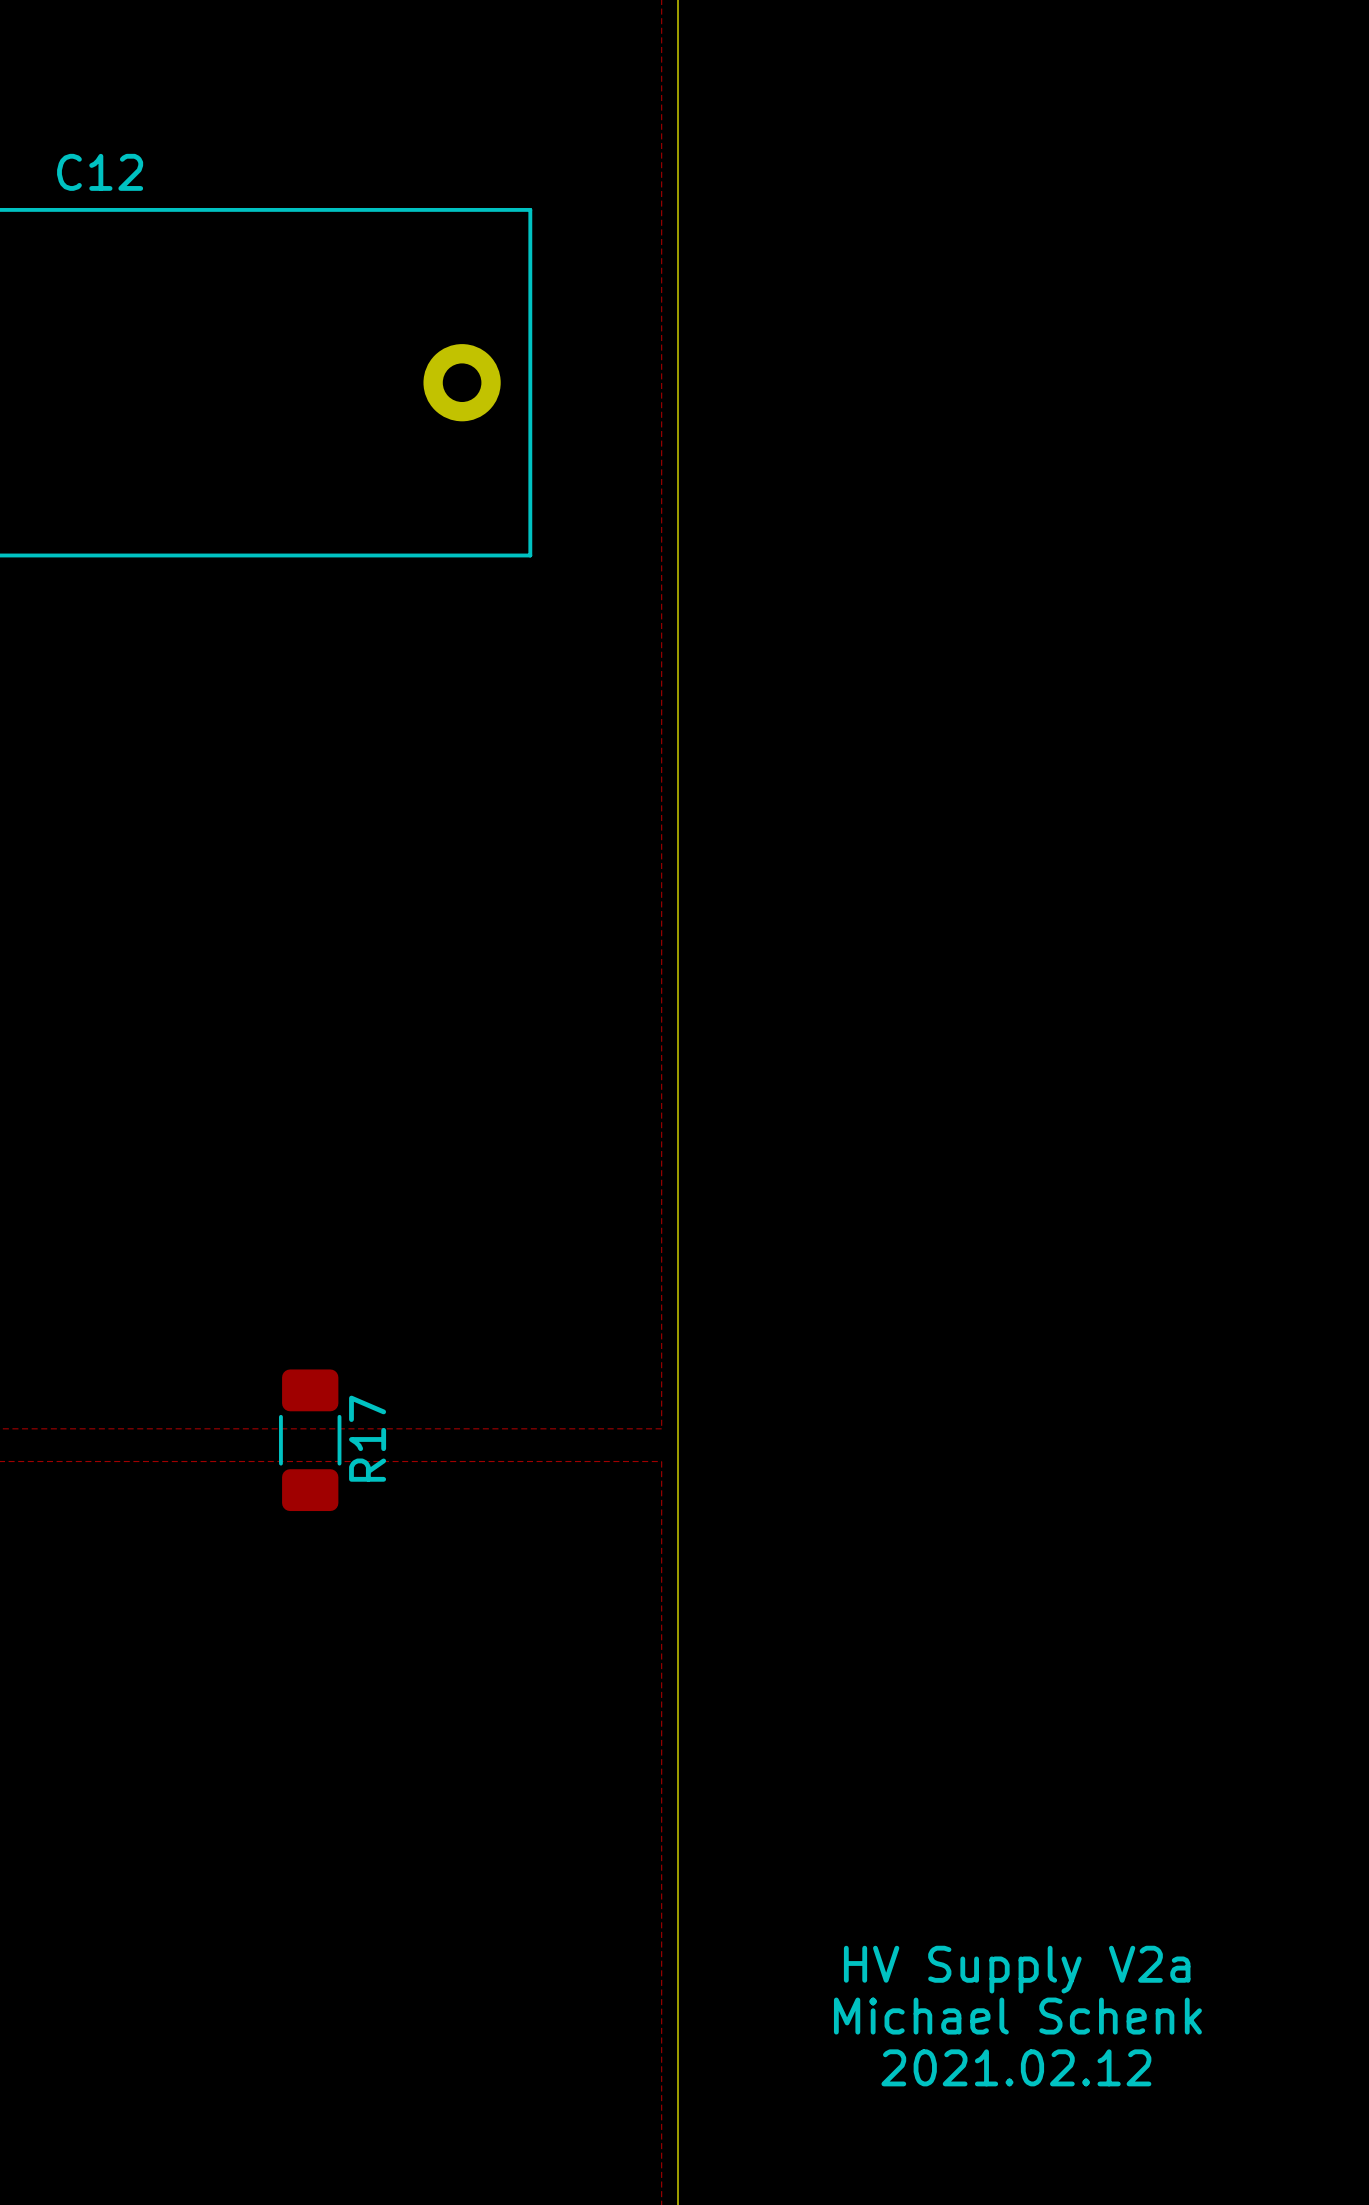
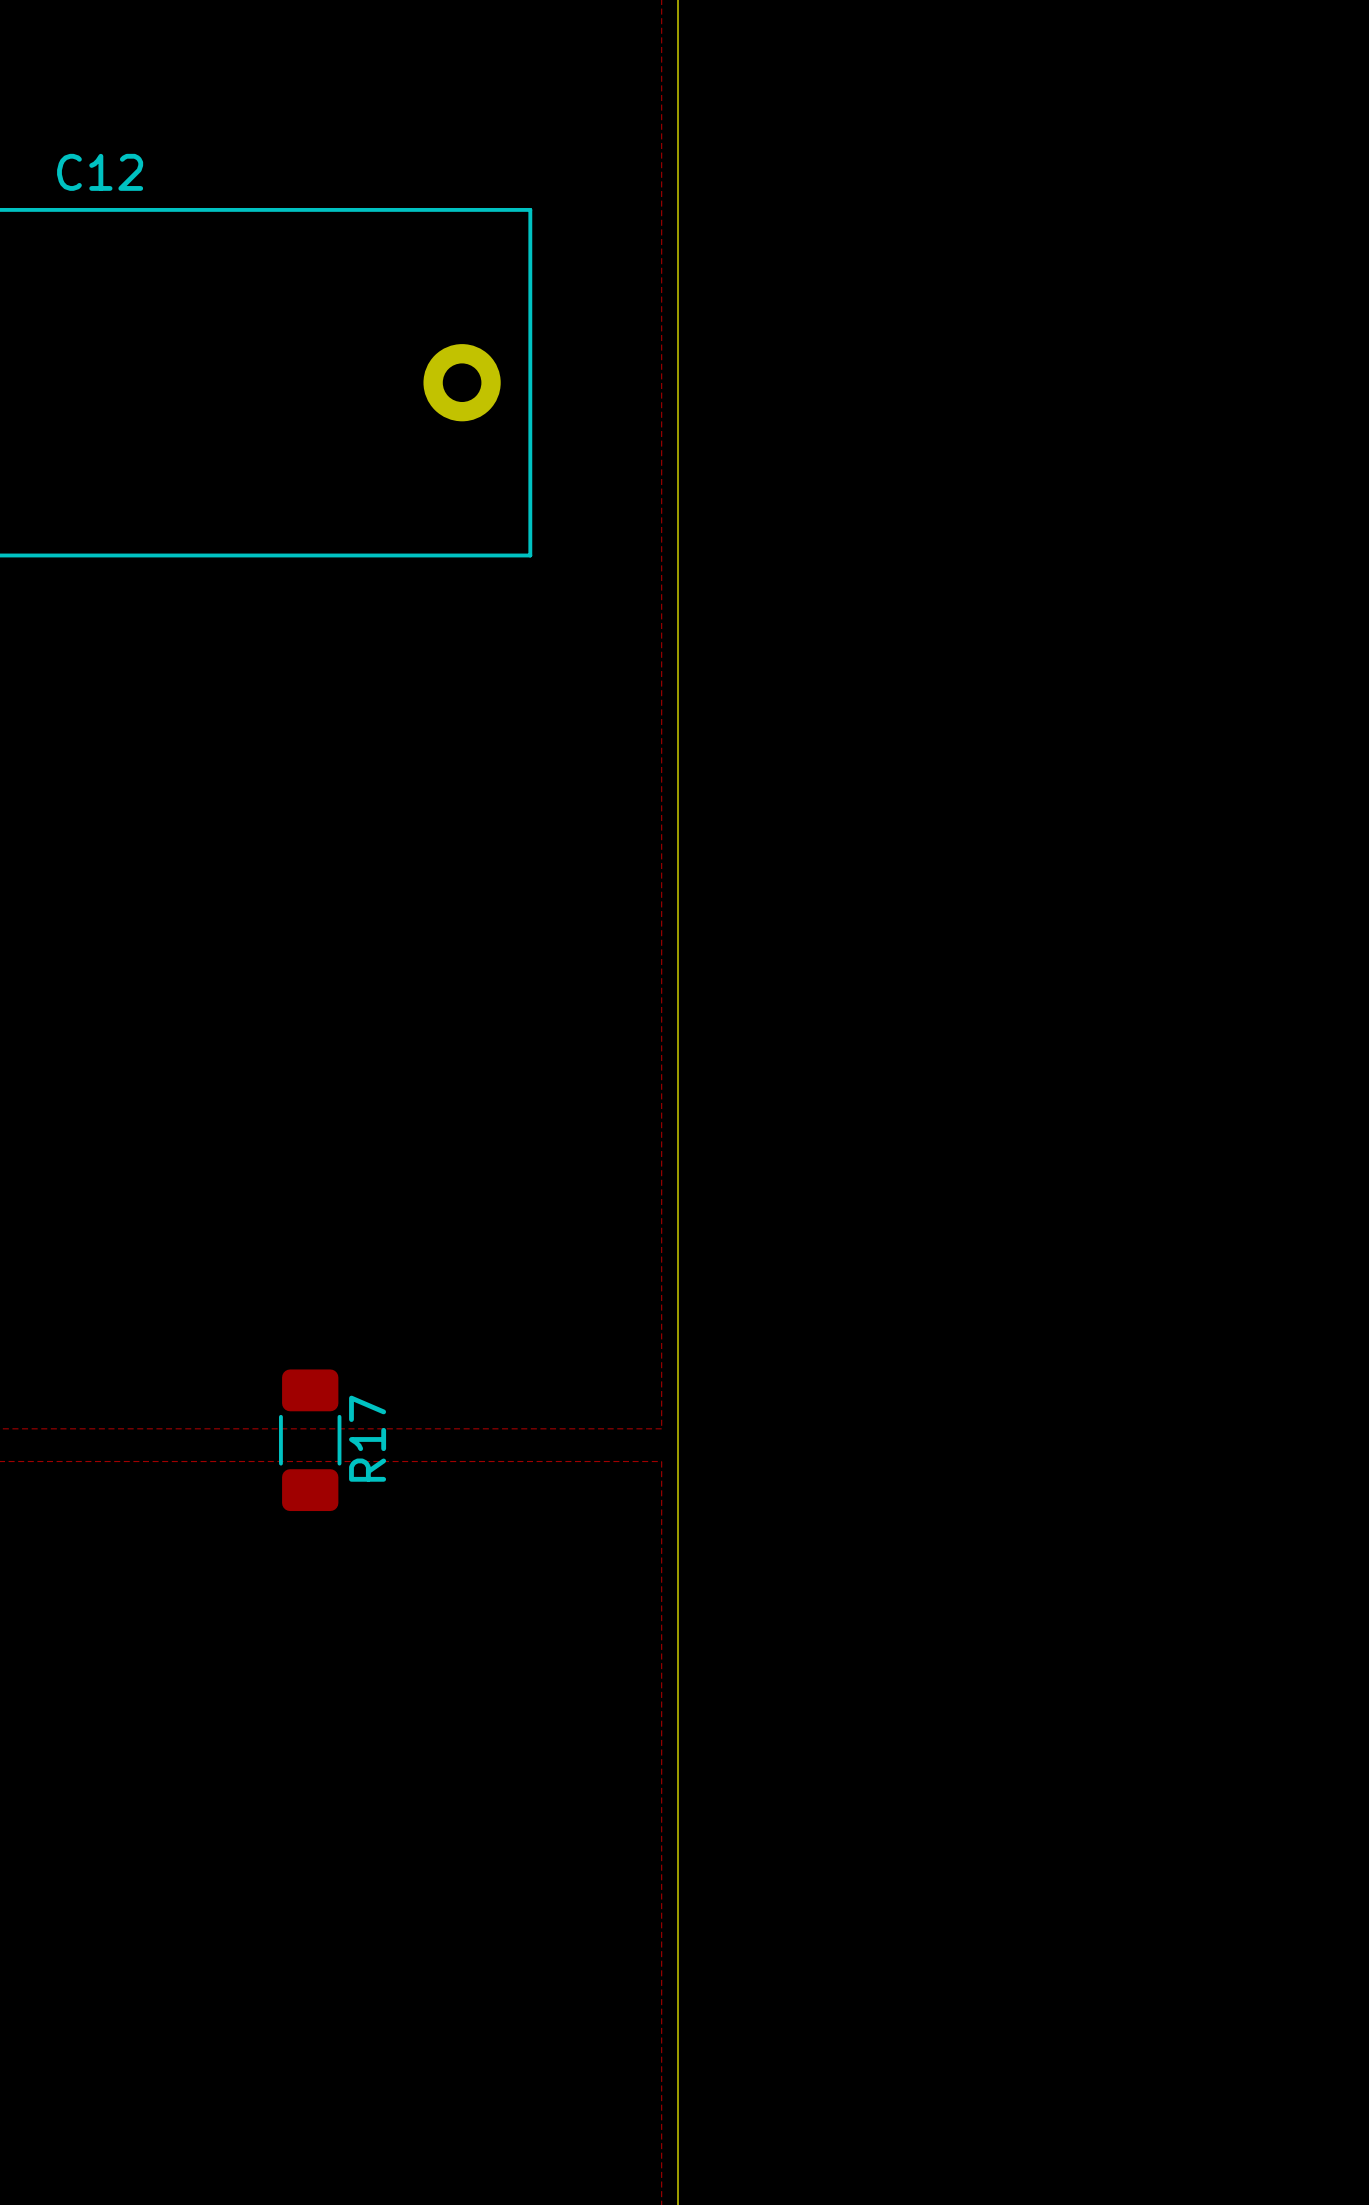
text: HV Supply V2a (1017, 1969) -> none
text: Michael Schenk (1017, 2016) -> none
text: 2021.02.12 (1016, 2067) -> none

